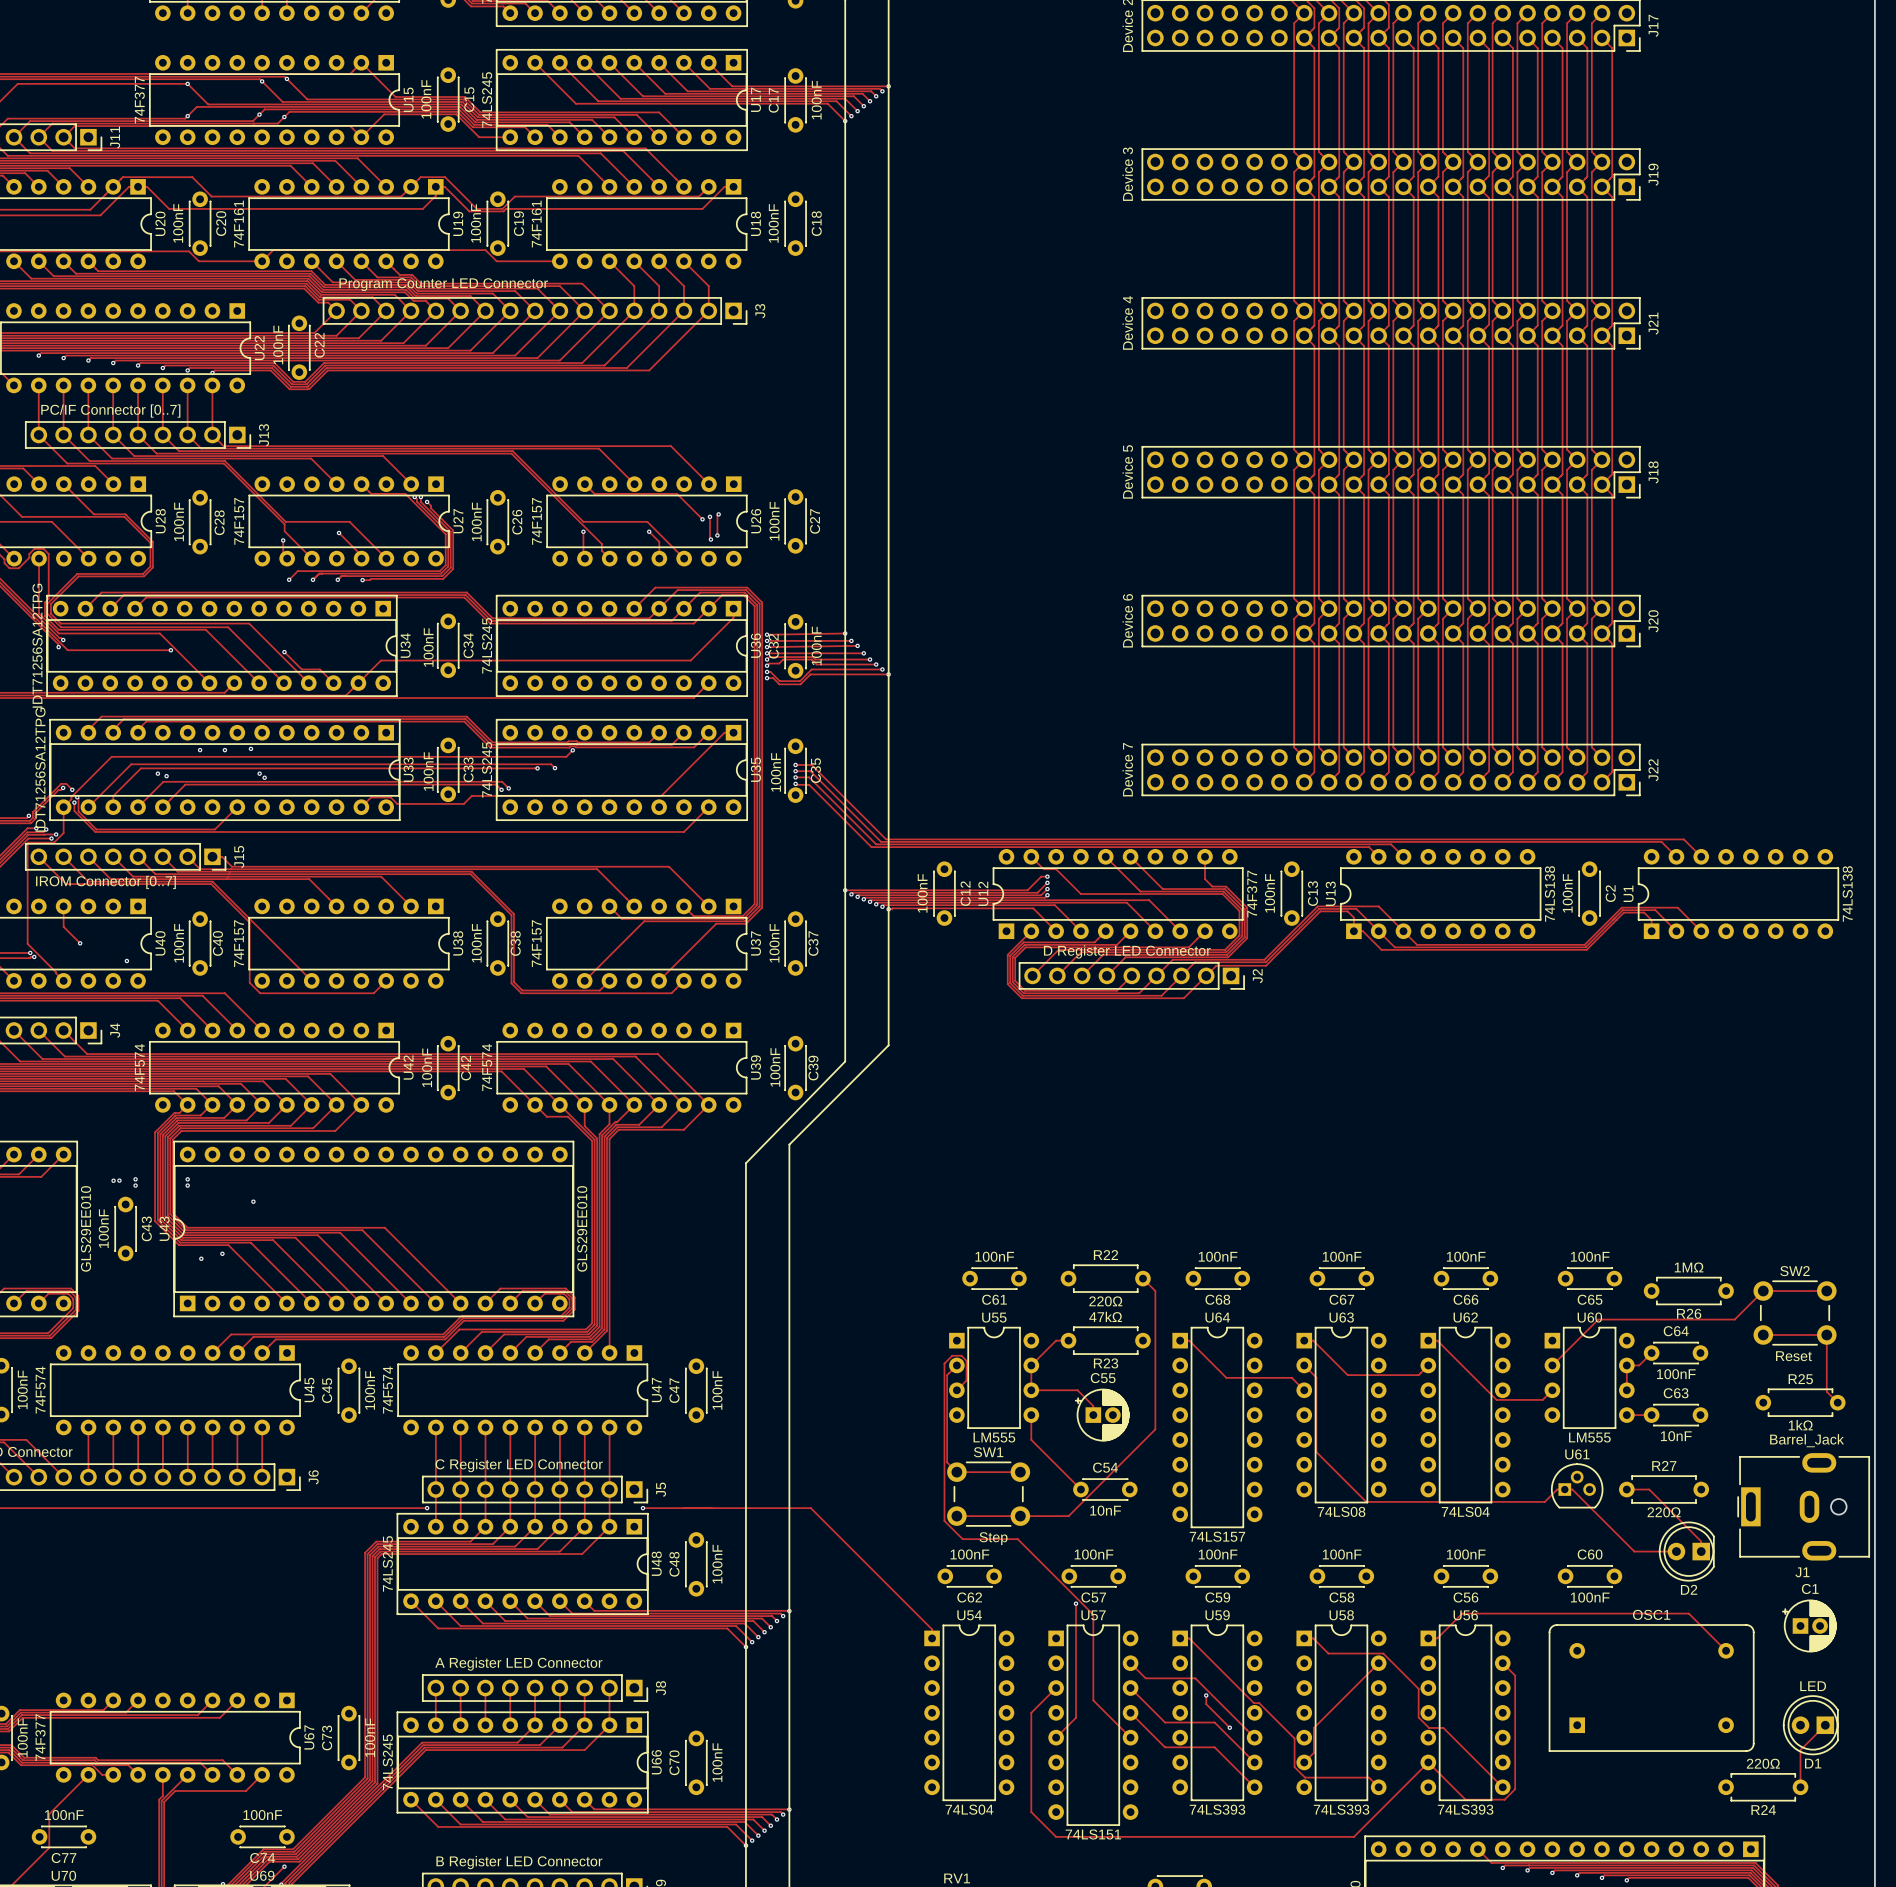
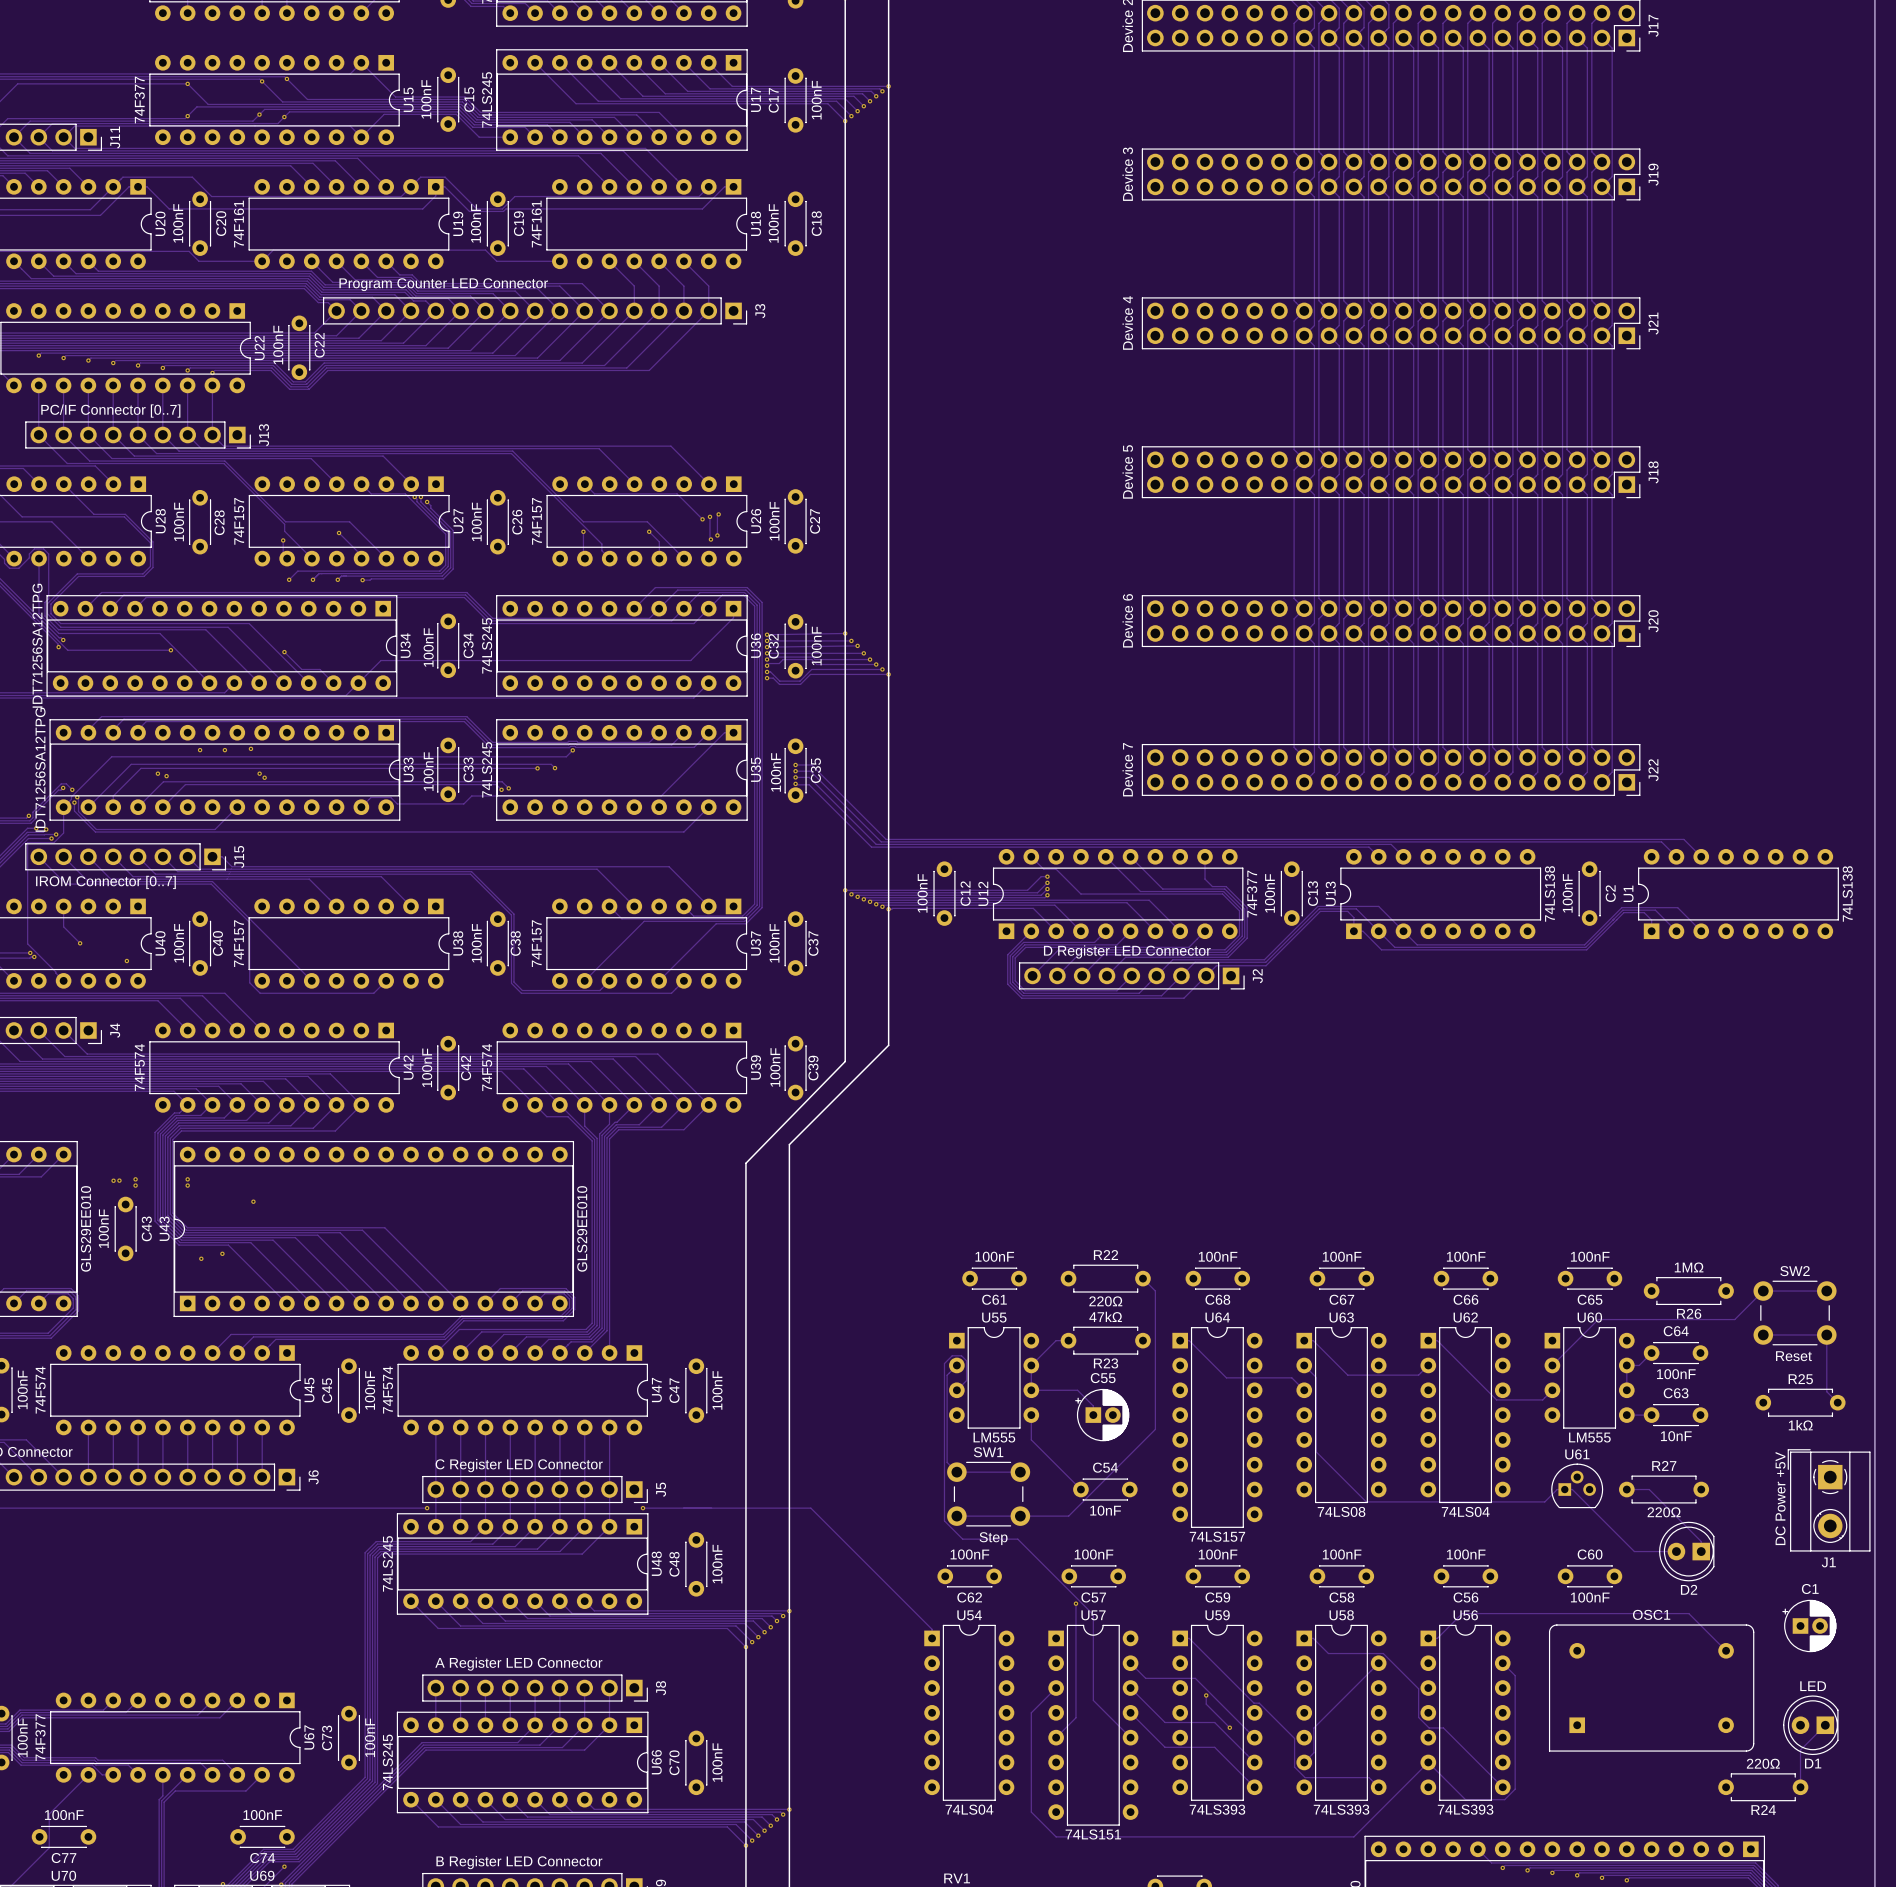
J1 value: Barrel_Jack (1807, 1440) -> DC Power +5V (1780, 1498)
J1 footprint: [1737, 1453, 1870, 1561] -> [1787, 1449, 1871, 1552]

